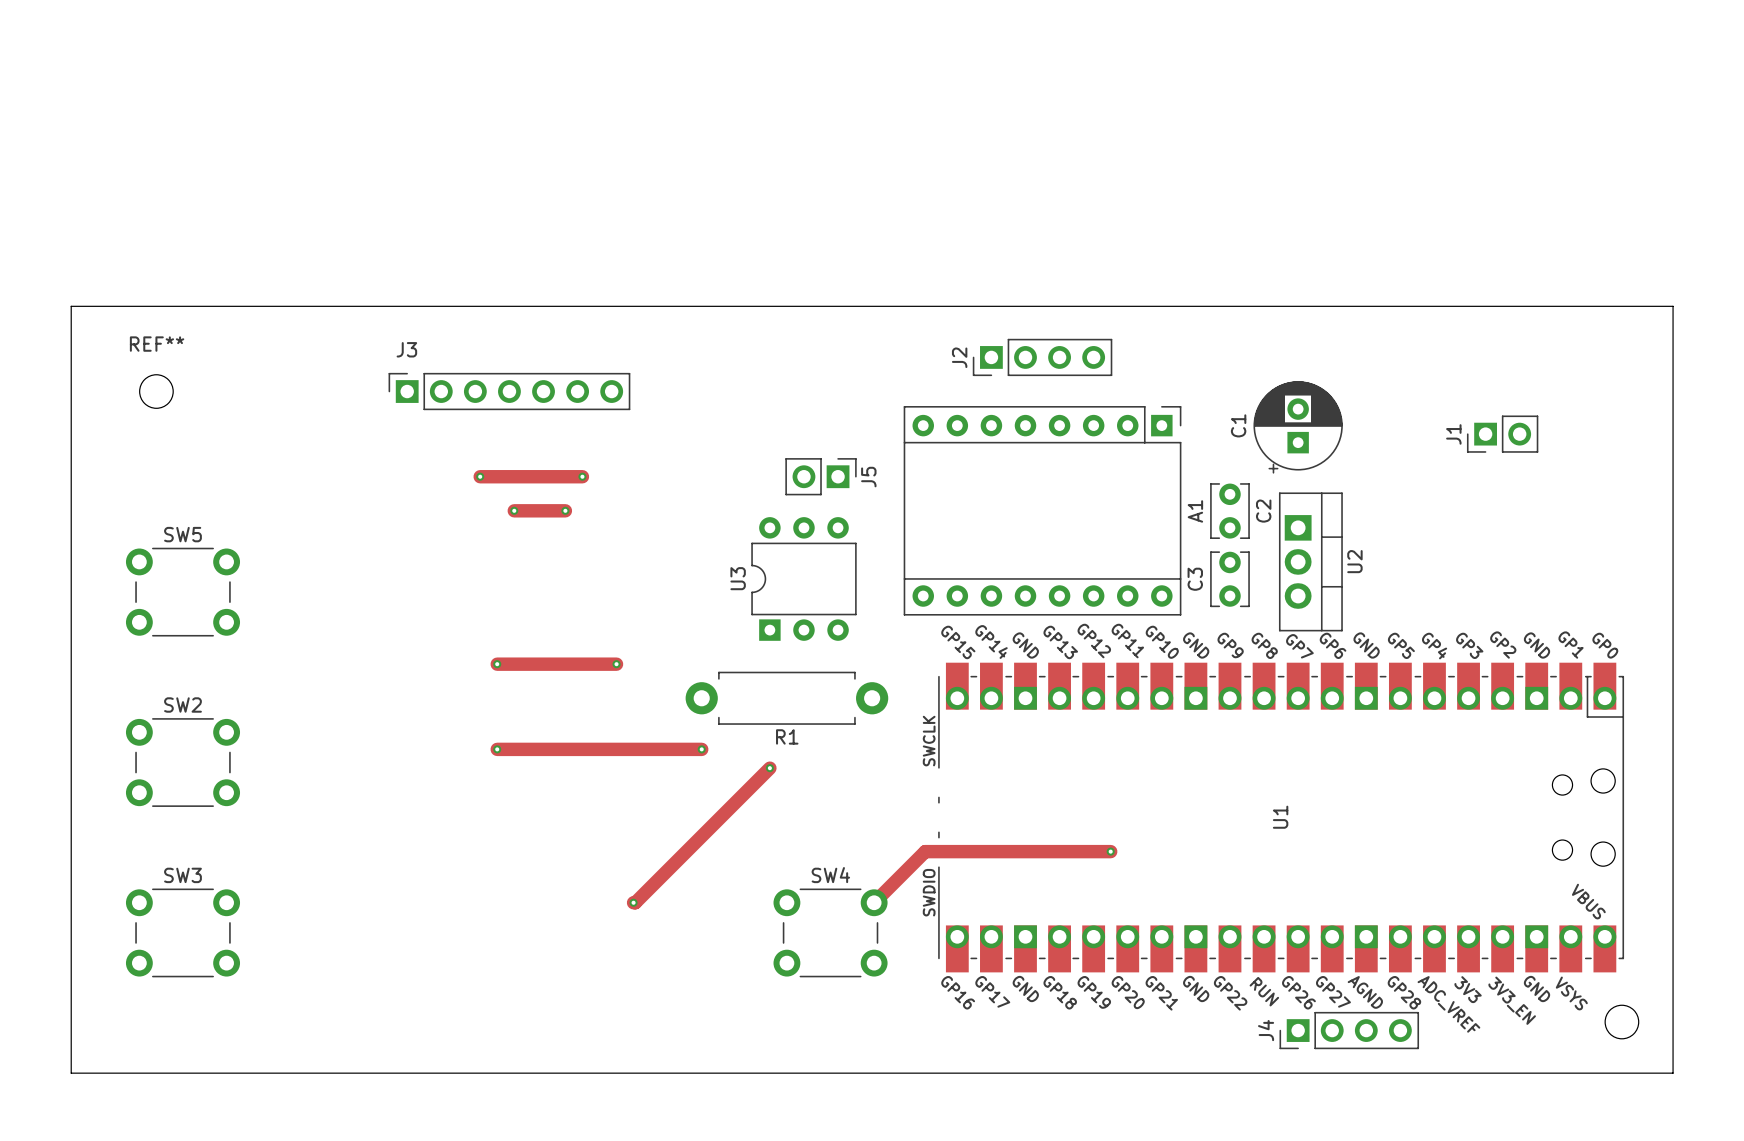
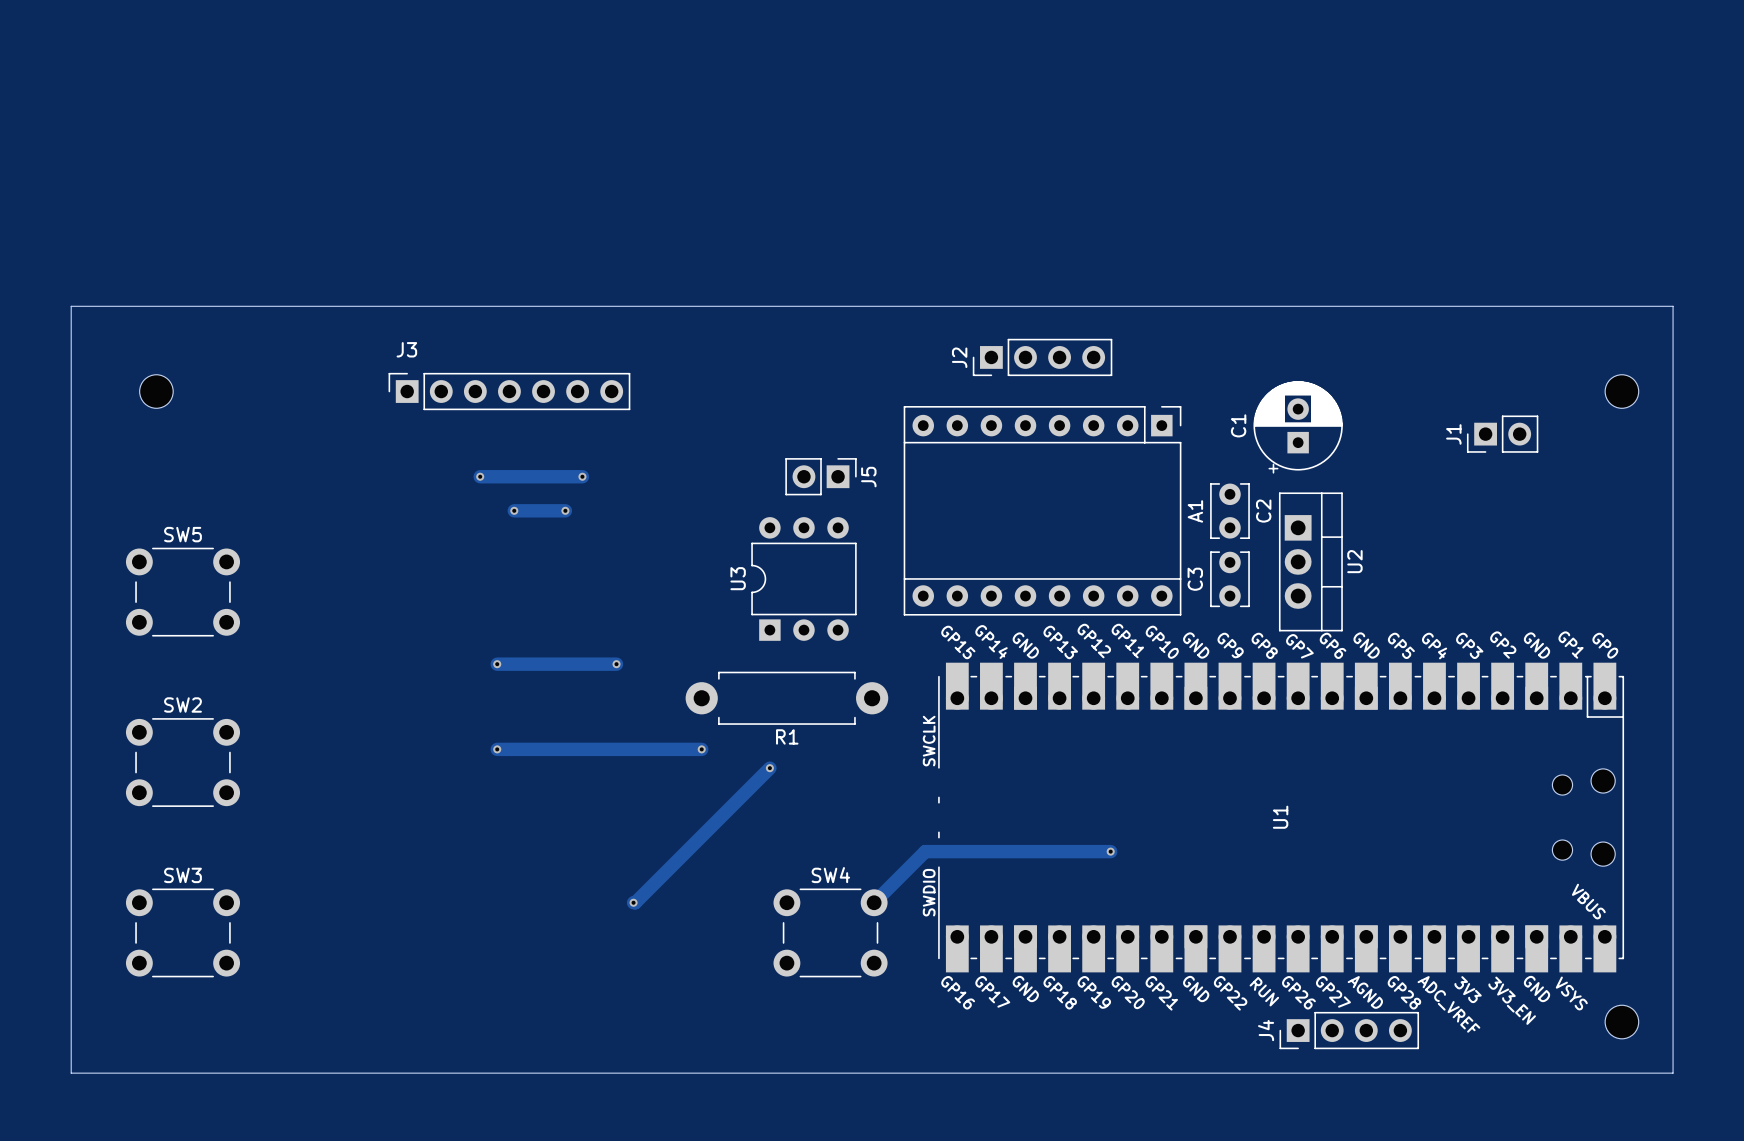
REF** name: REF** (157, 344) -> none
part: none -> (1621, 391)

